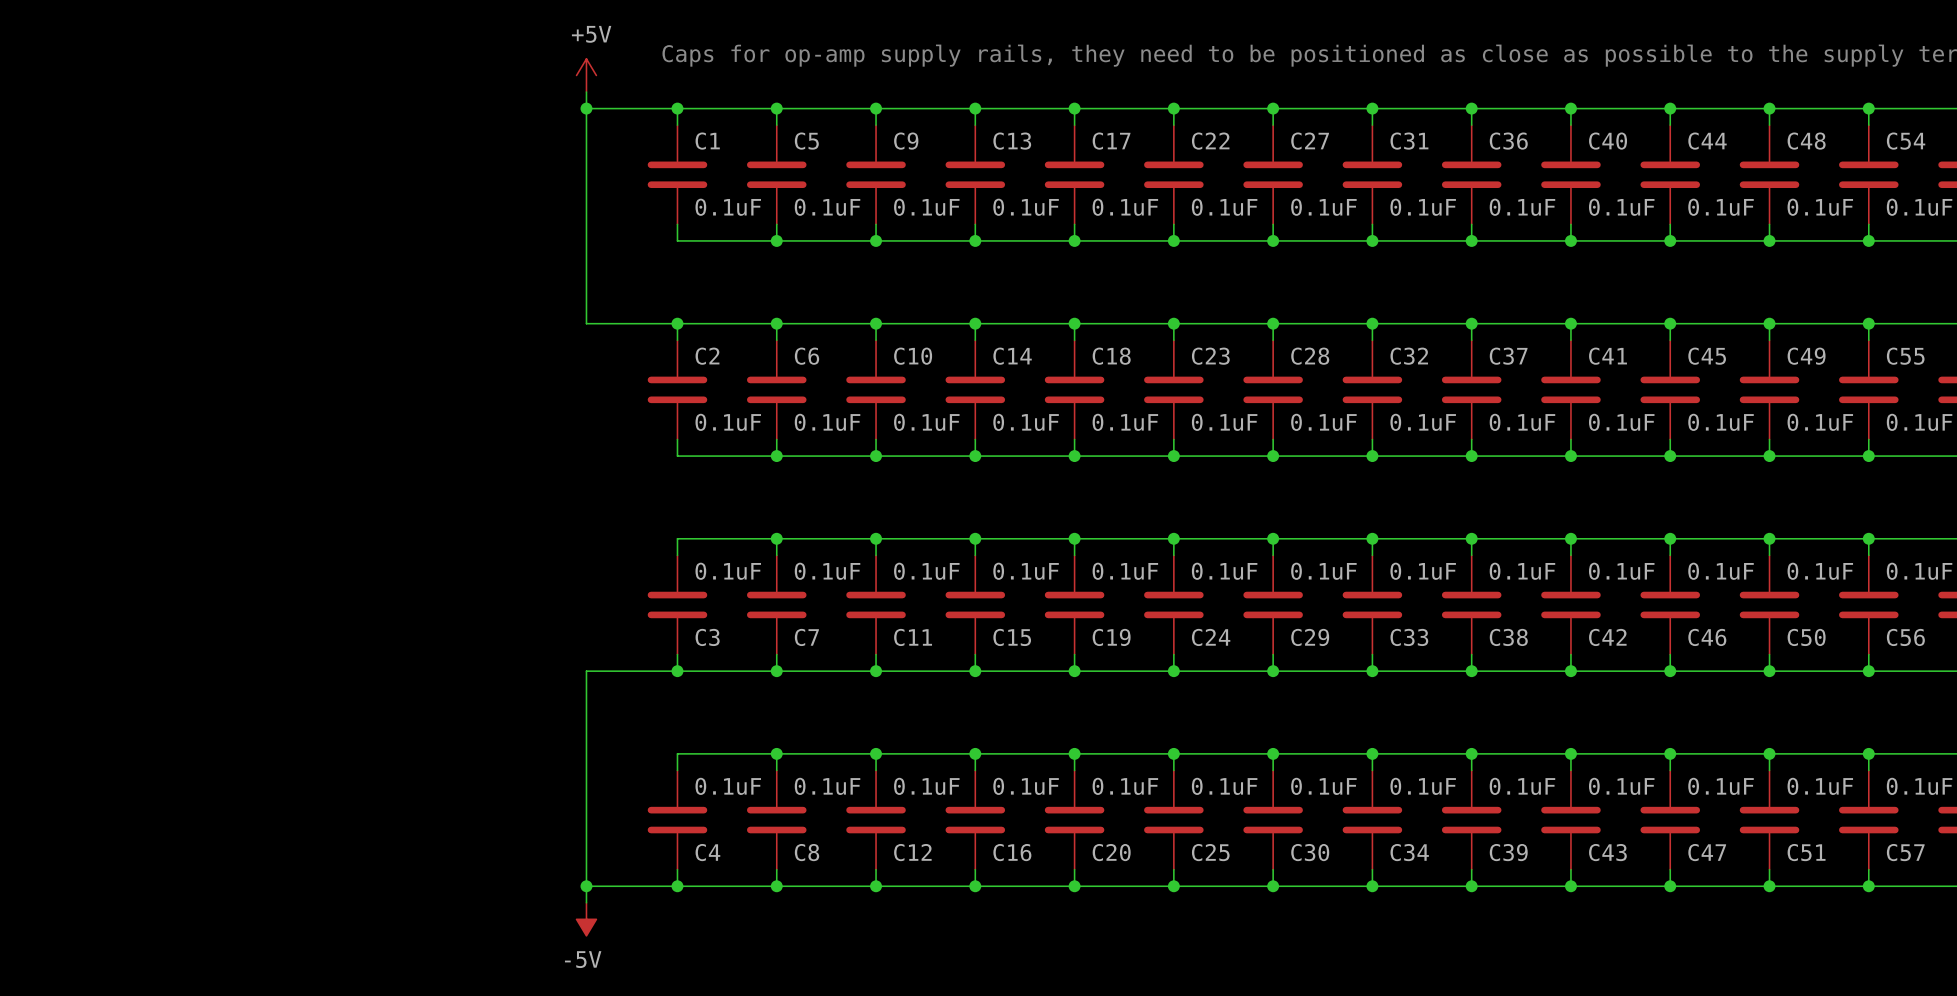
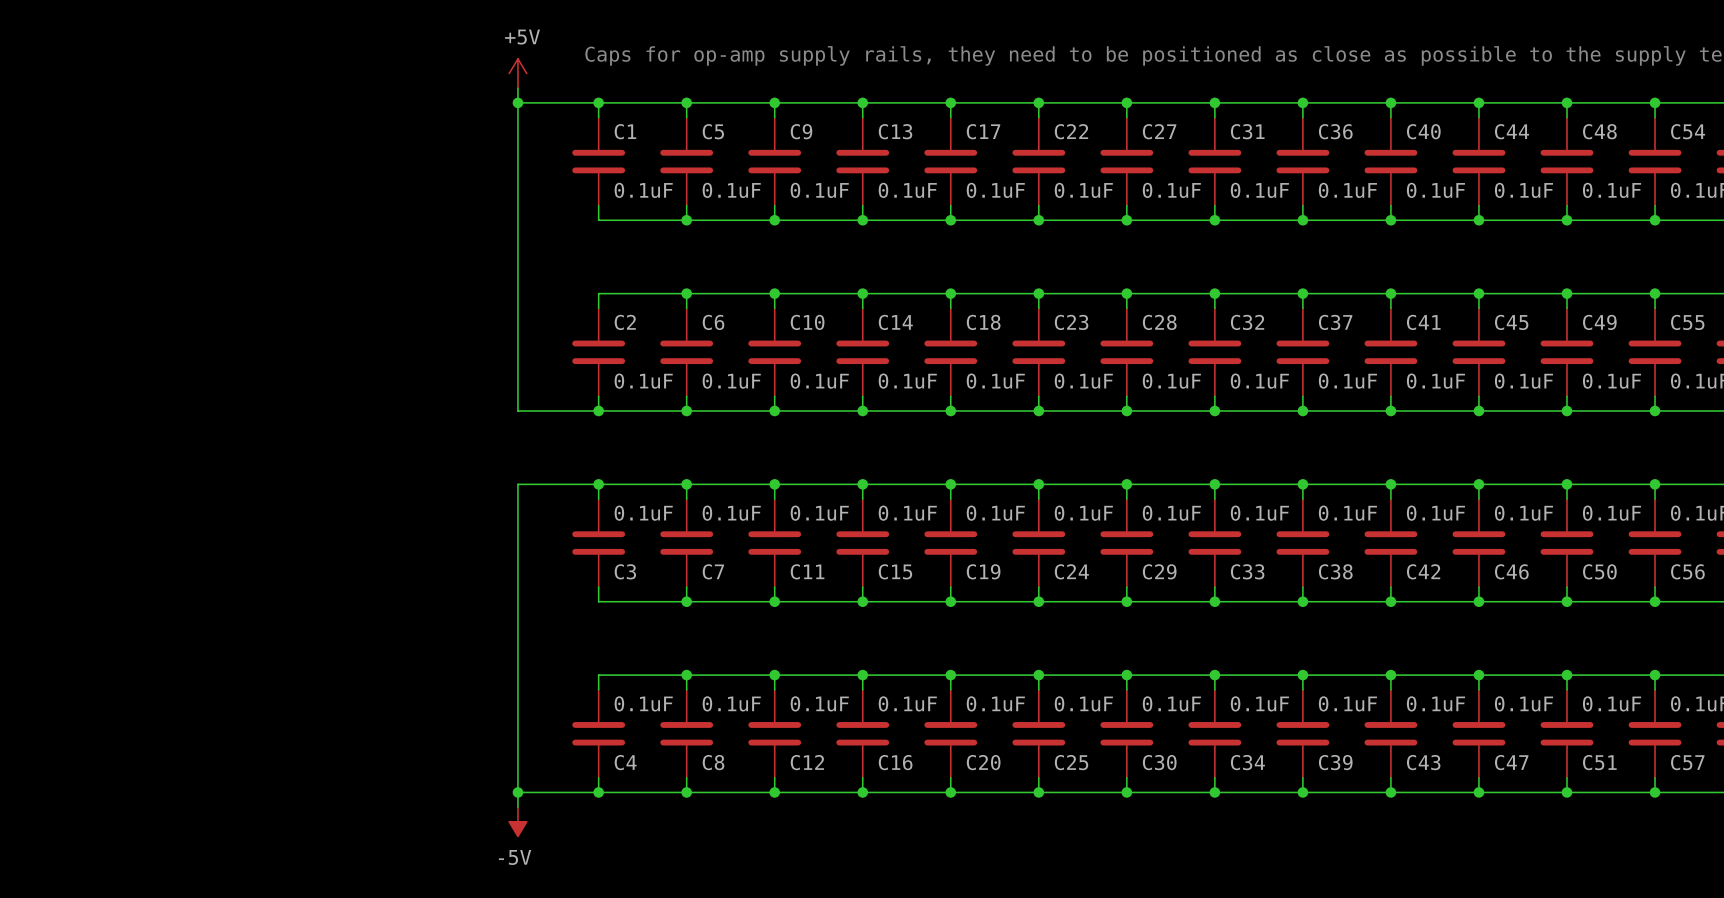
wire: (586, 323) (677, 323) -> (517, 293) (517, 411) (598, 411)
junction: (677, 323) -> none
junction: none -> (598, 411)
junction: none -> (598, 484)
wire: (586, 671) (677, 671) -> (517, 601) (517, 484) (598, 484)
junction: (677, 671) -> none

